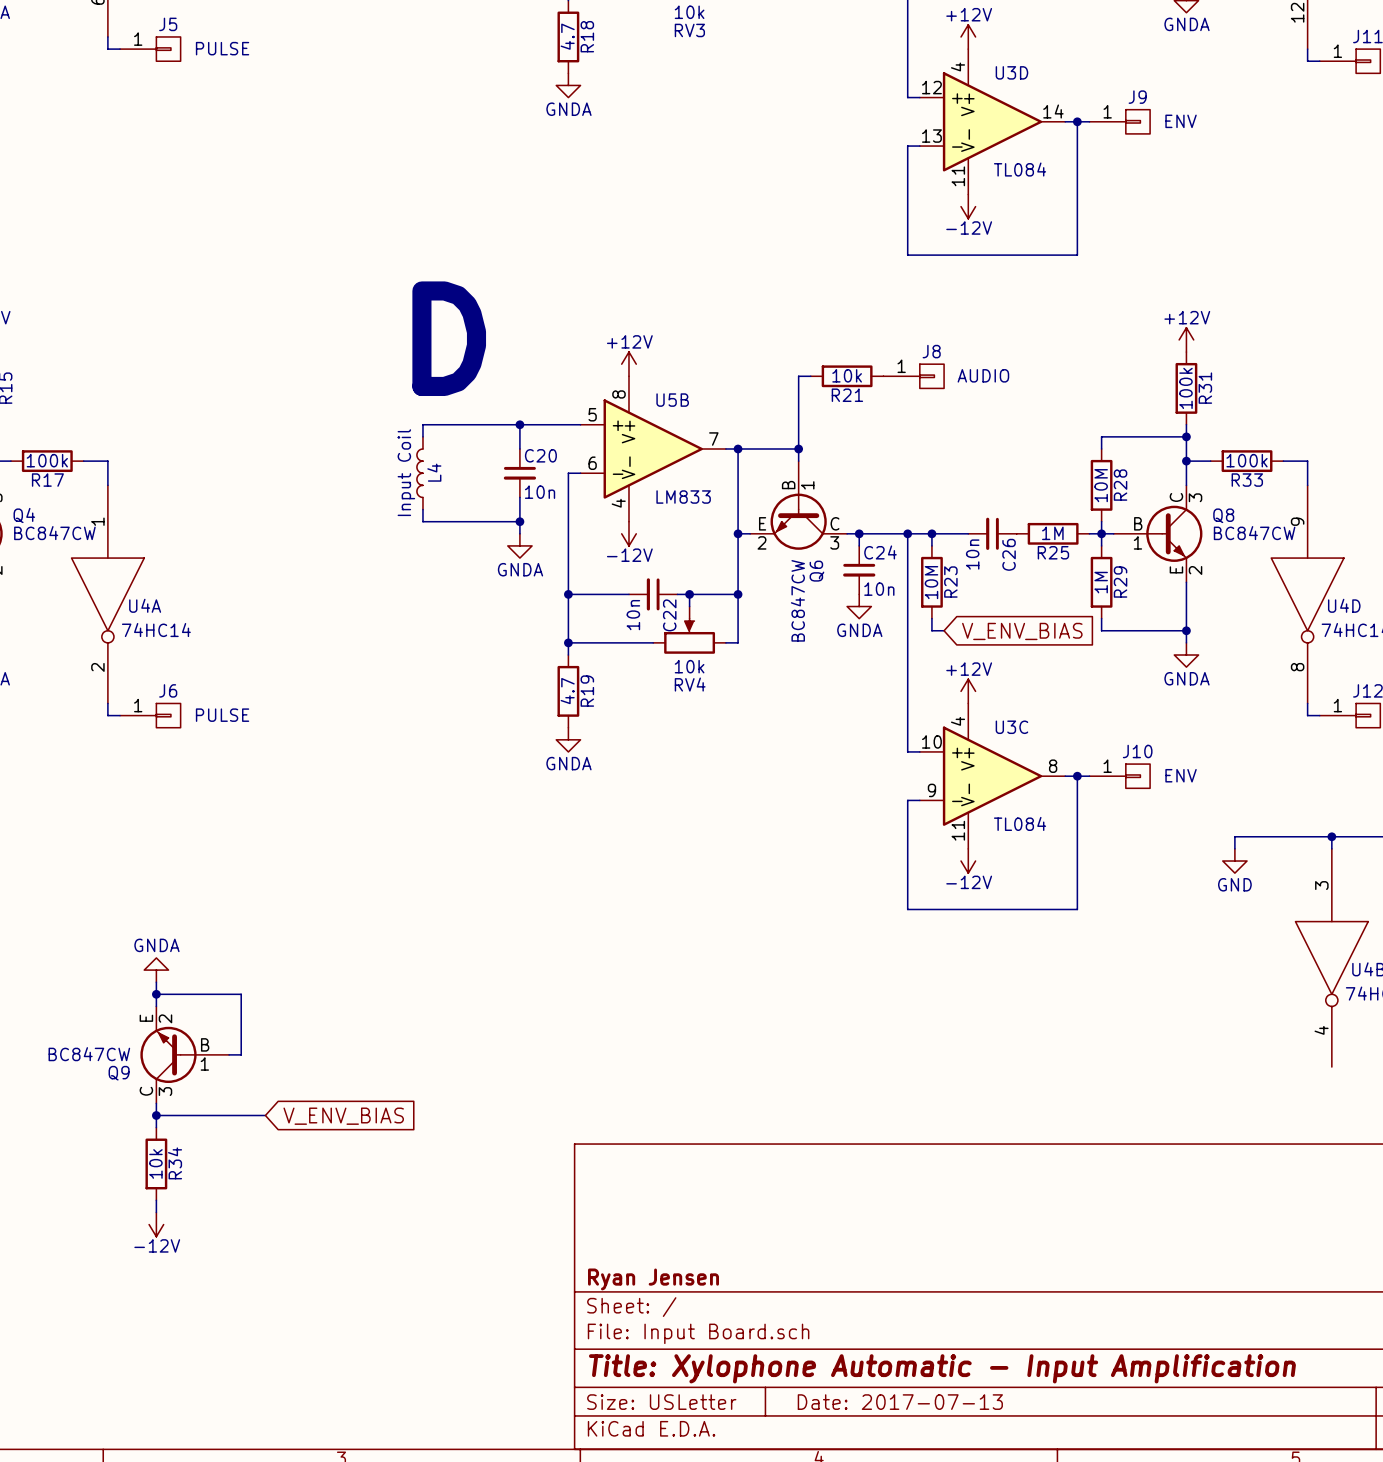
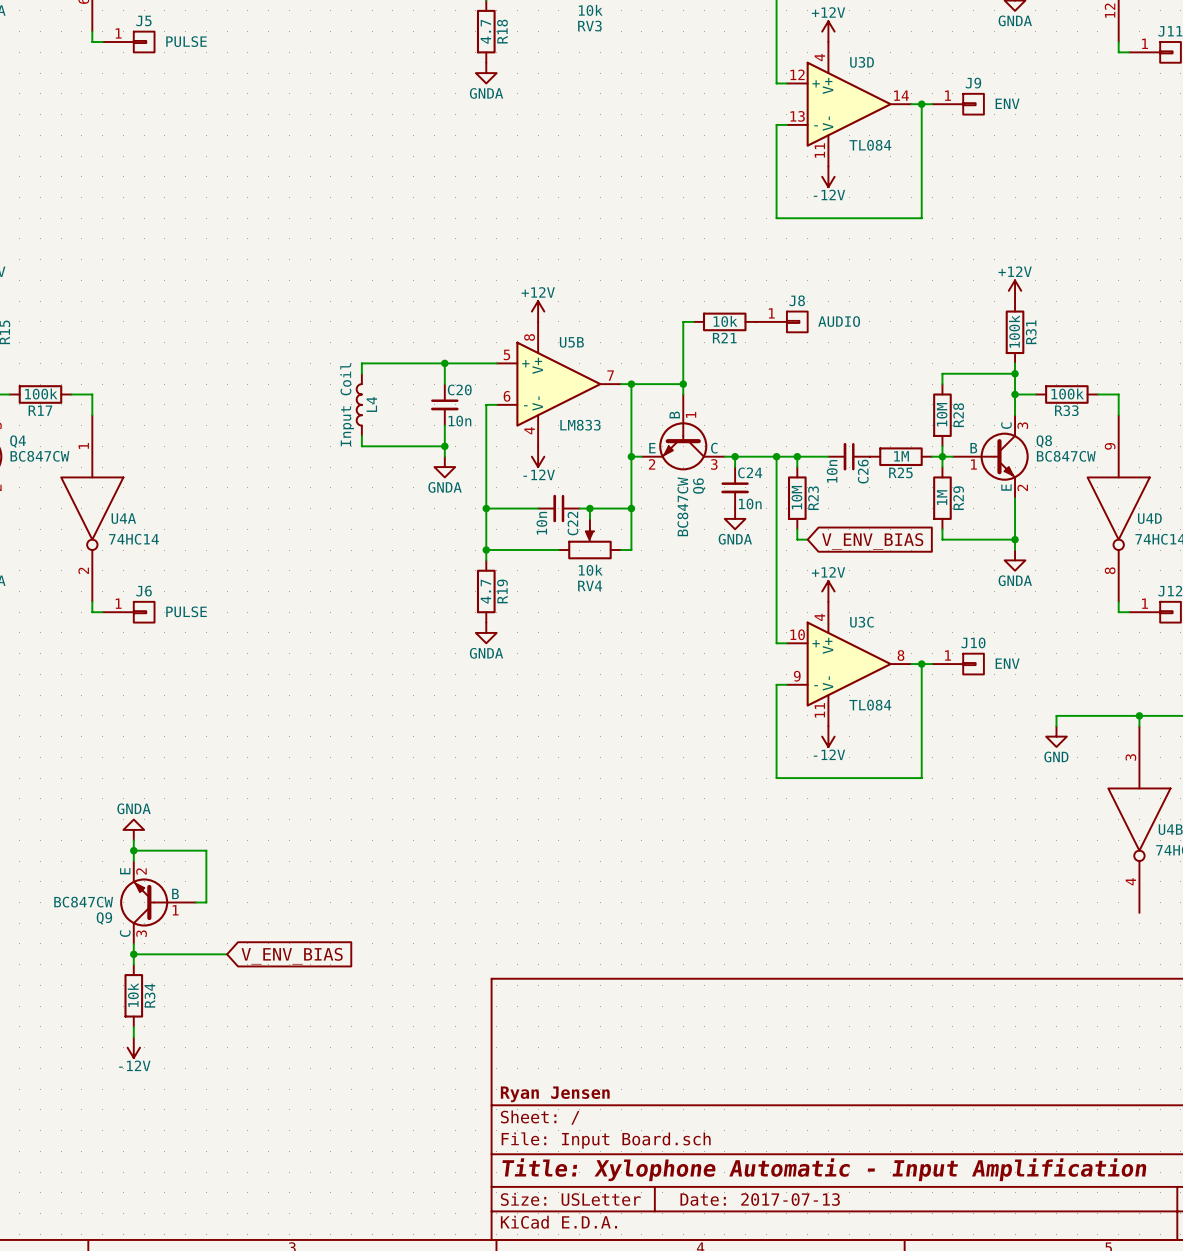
text: D (449, 338) -> none

